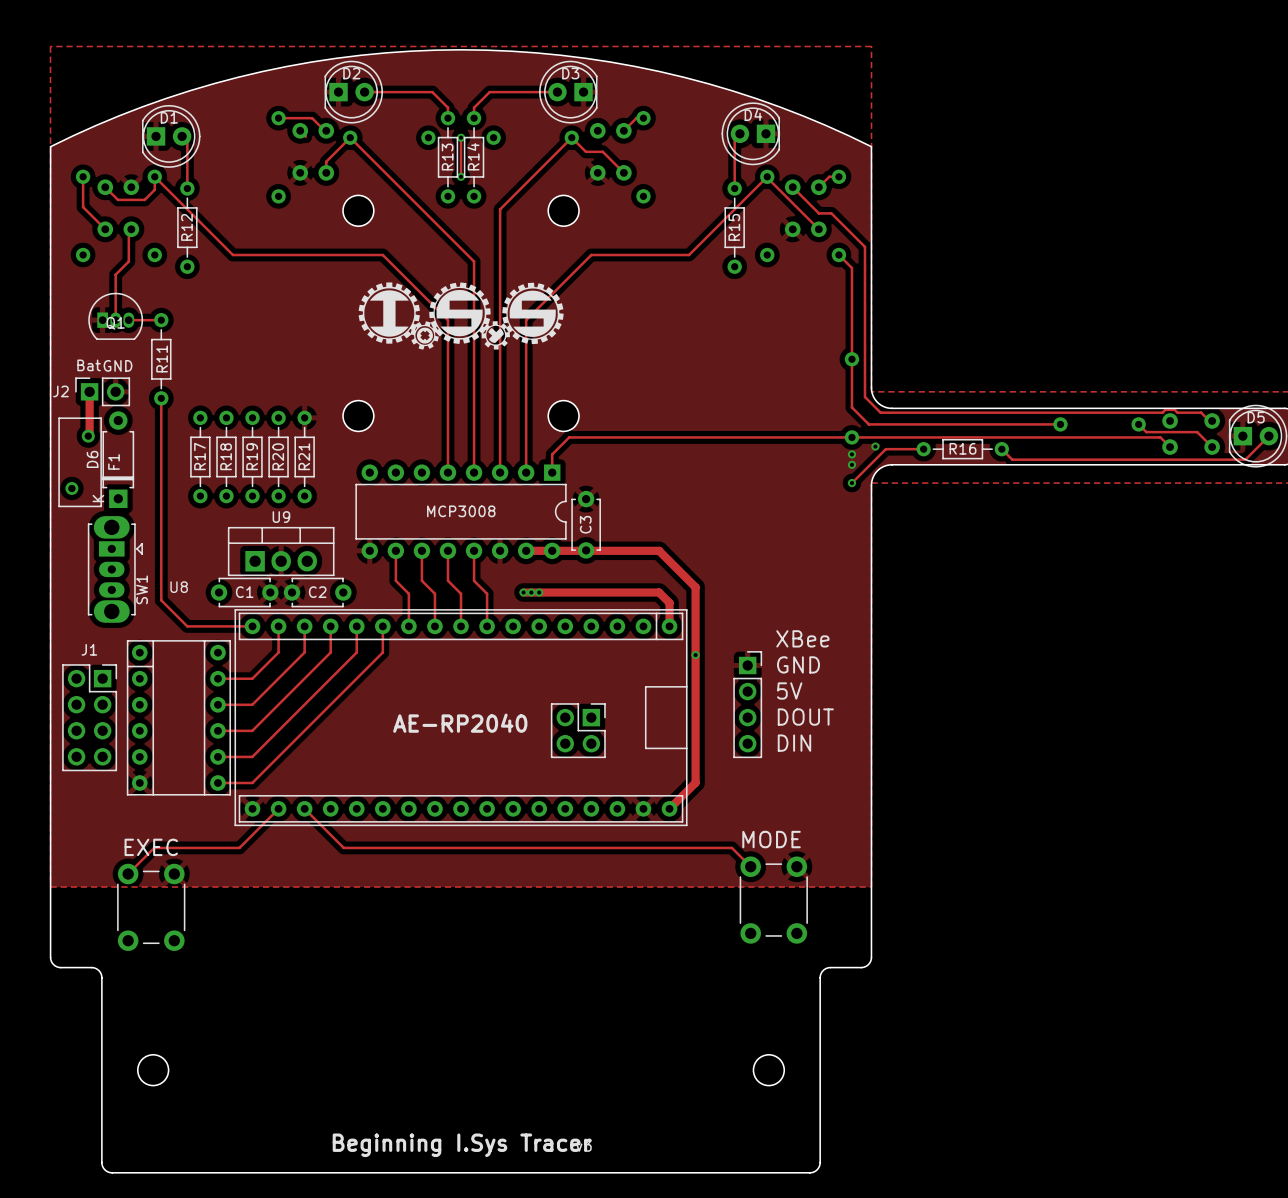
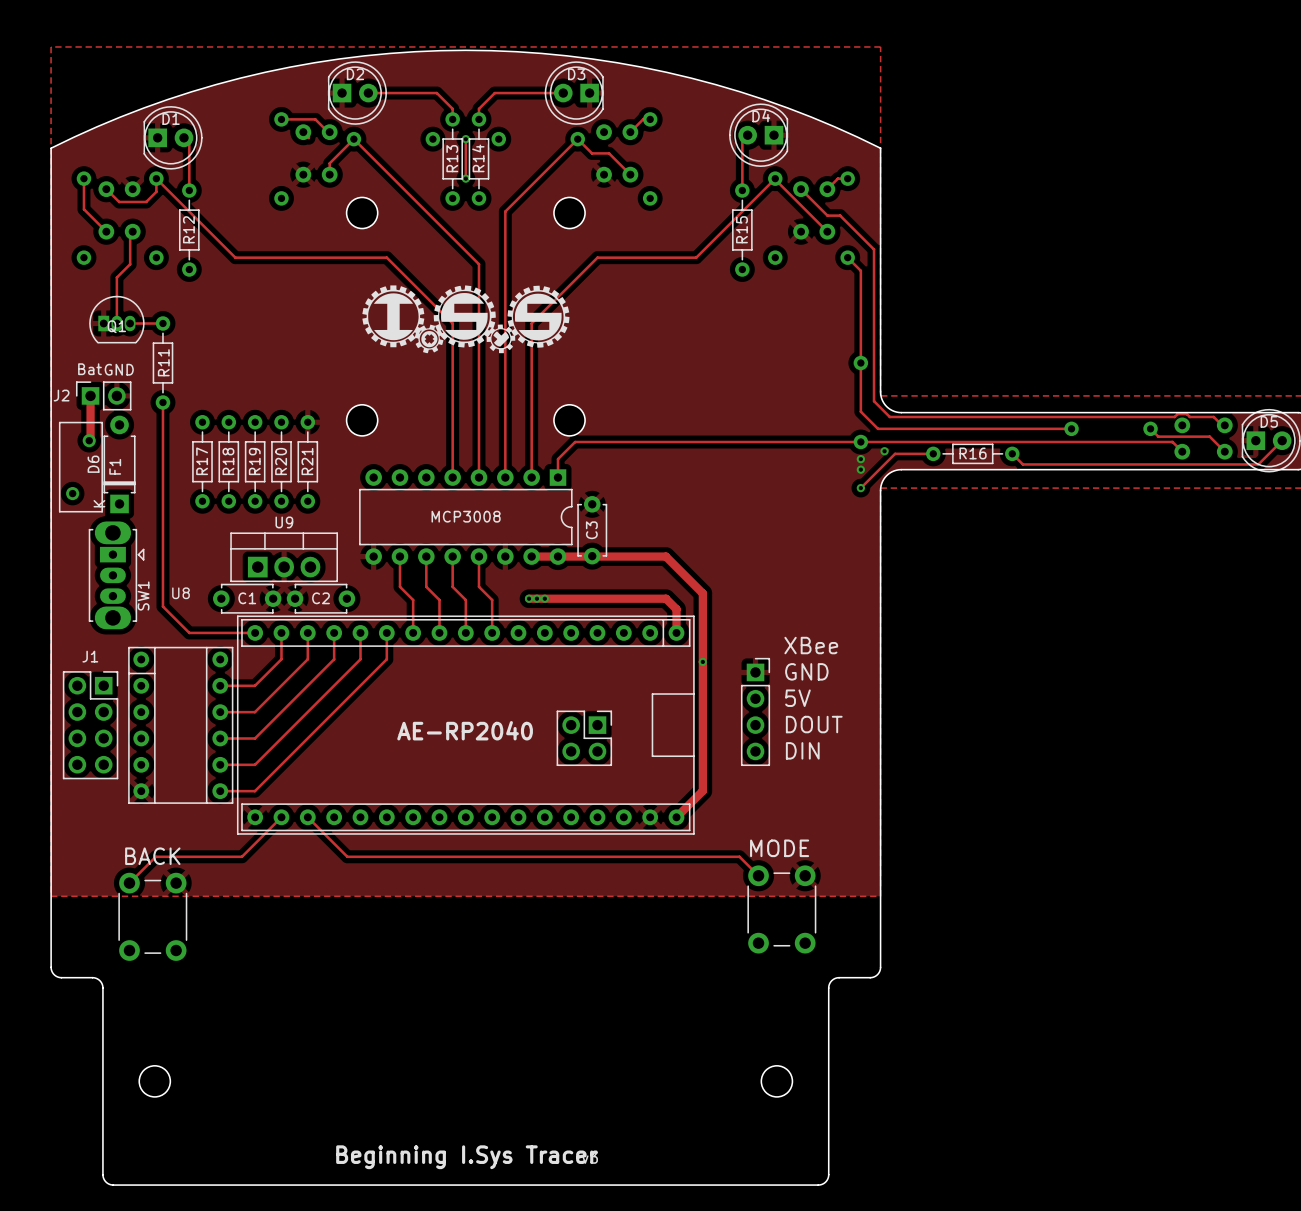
text: EXEC (151, 847) -> BACK (152, 856)

